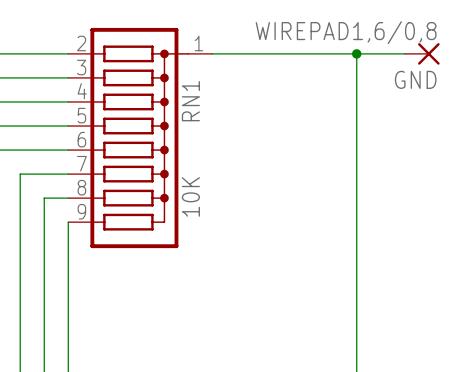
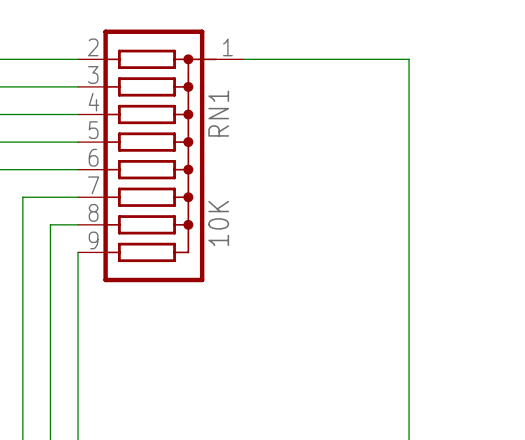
wire: (356, 53) (404, 53) -> none
junction: (356, 53) -> none
GND: WIREPAD1,6/0,8 (422, 53) -> none

